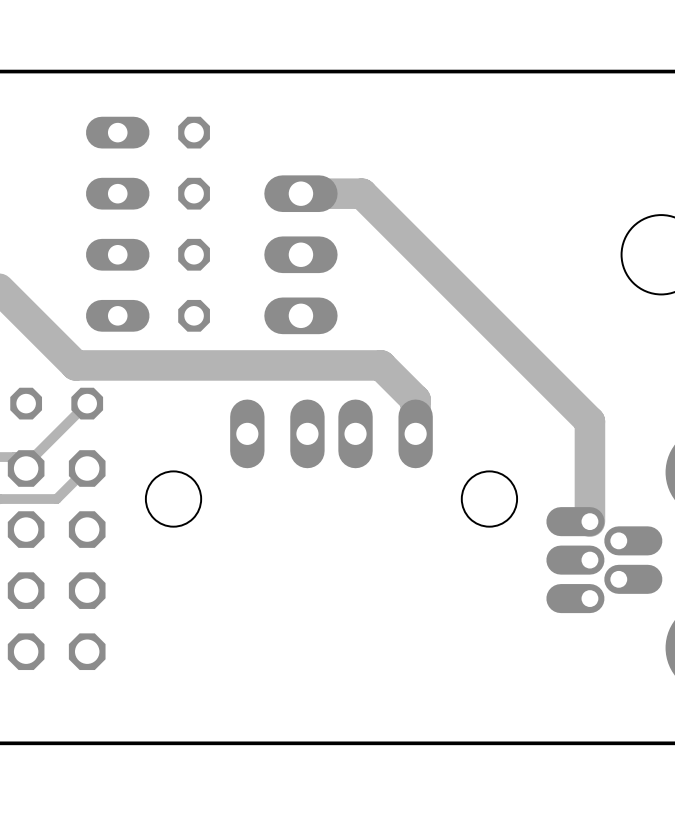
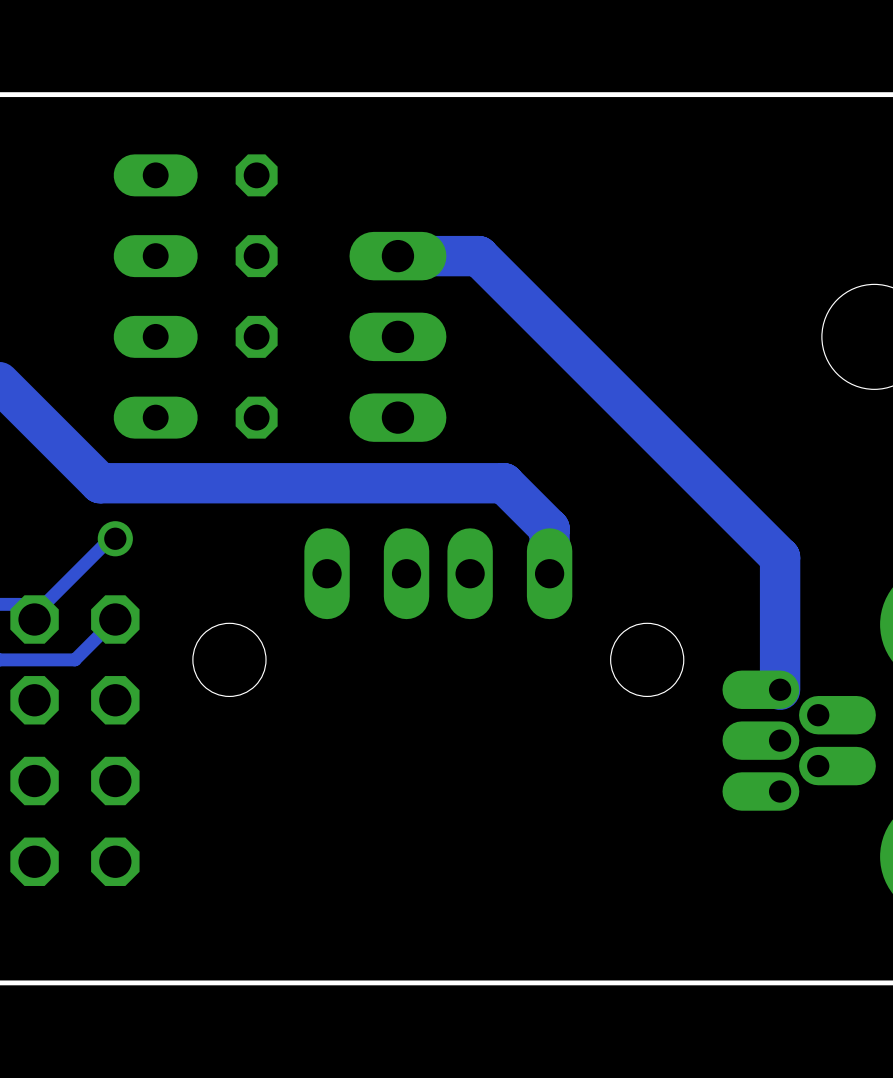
part: (56, 403) -> none
via: none -> (115, 538)

